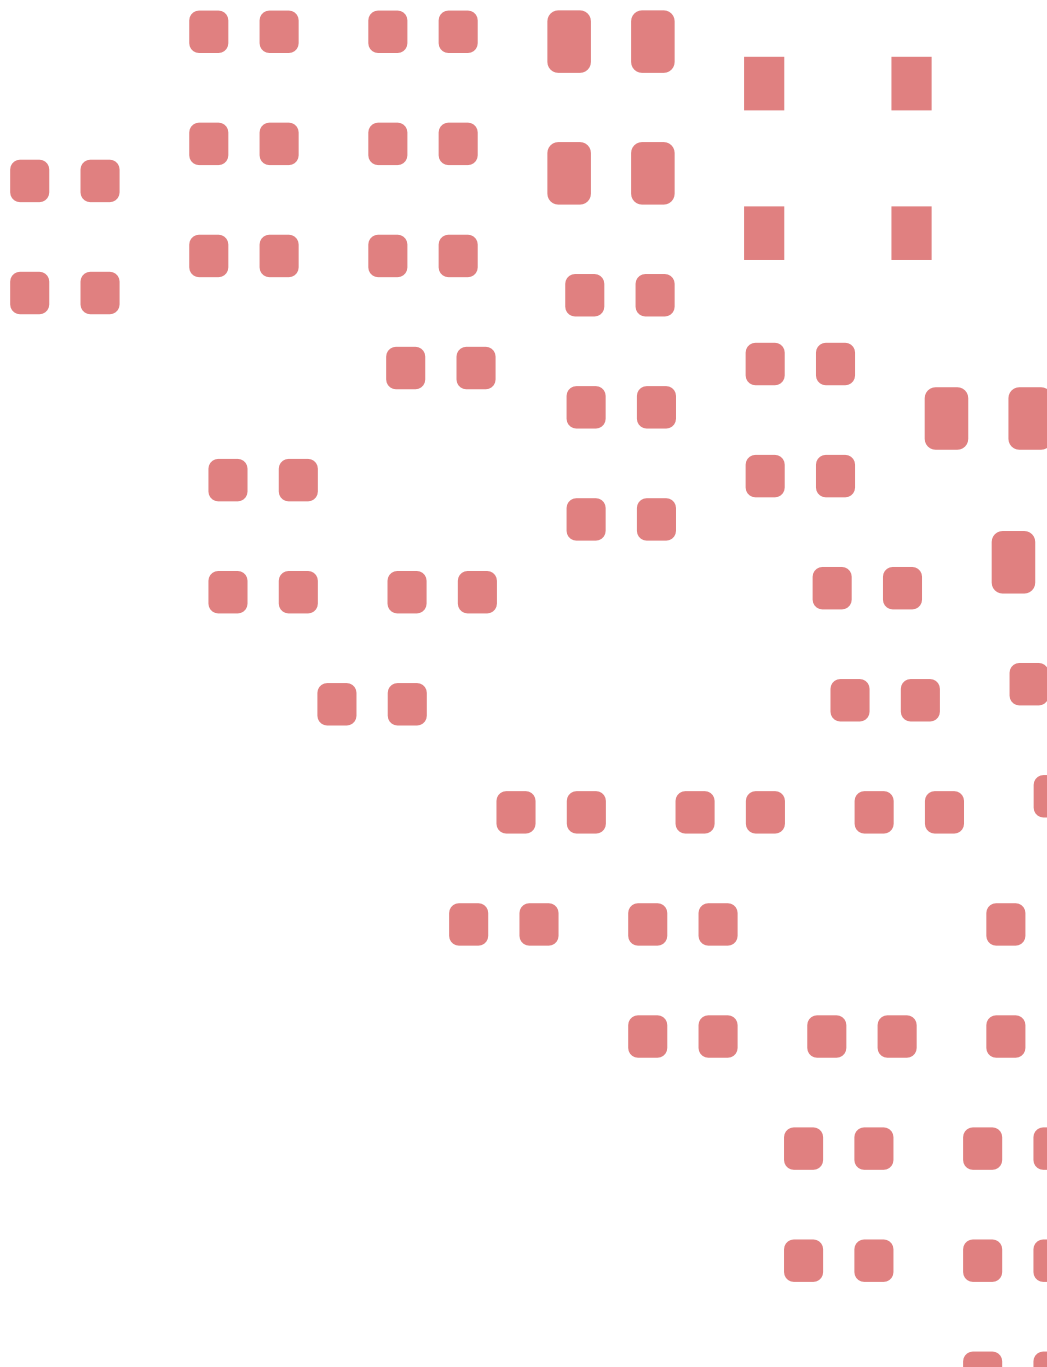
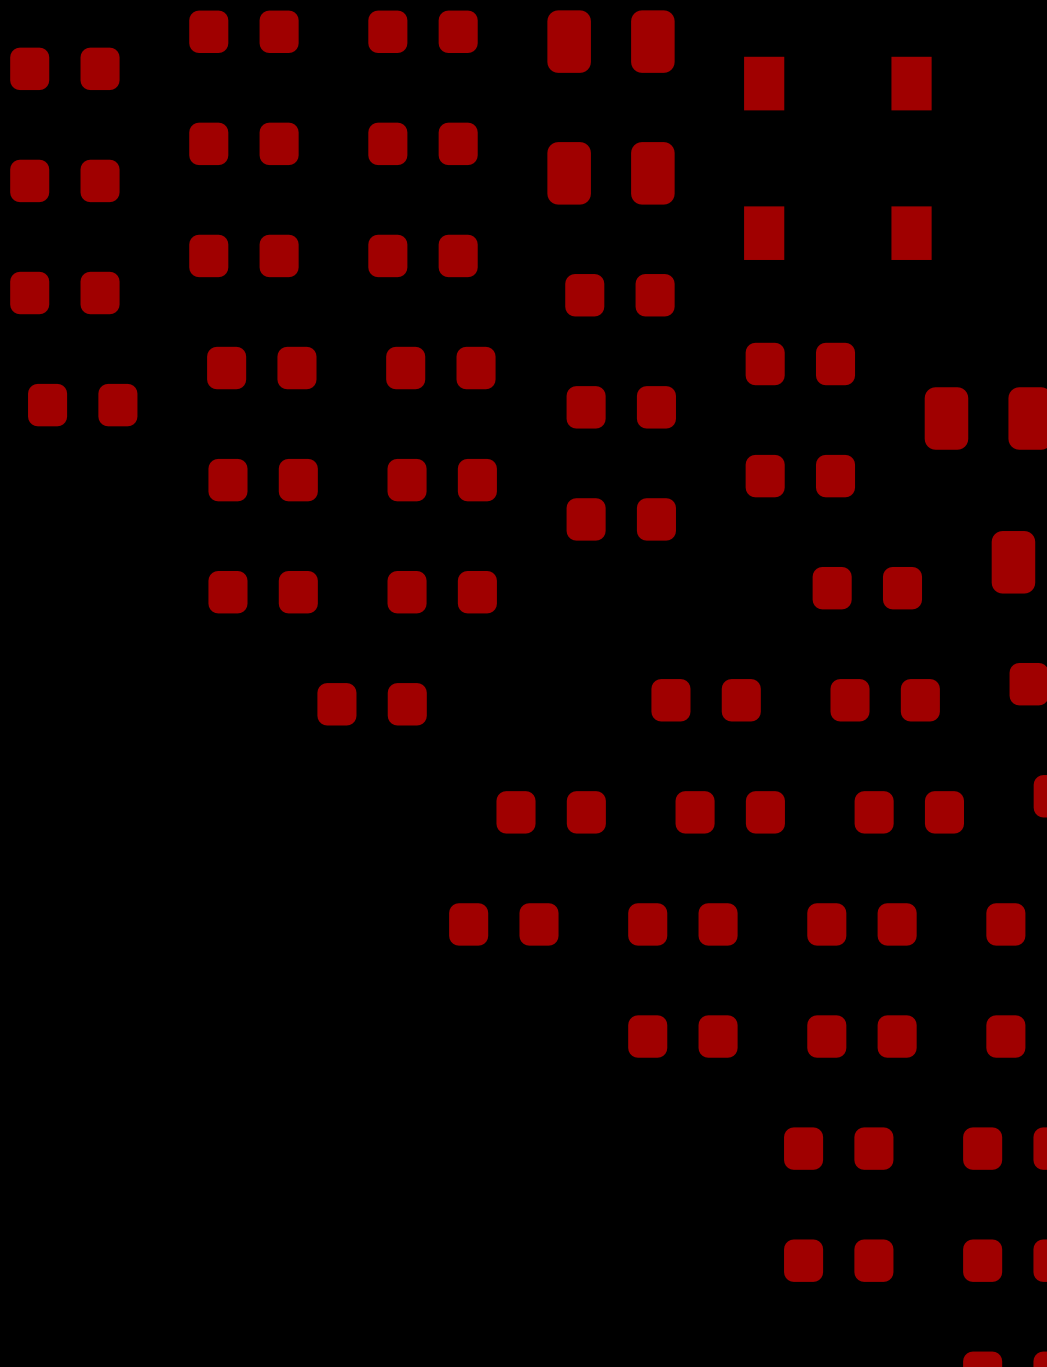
part: none -> (64, 68)
part: none -> (261, 368)
part: none -> (82, 405)
part: none -> (442, 480)
part: none -> (706, 700)
part: none -> (861, 924)

